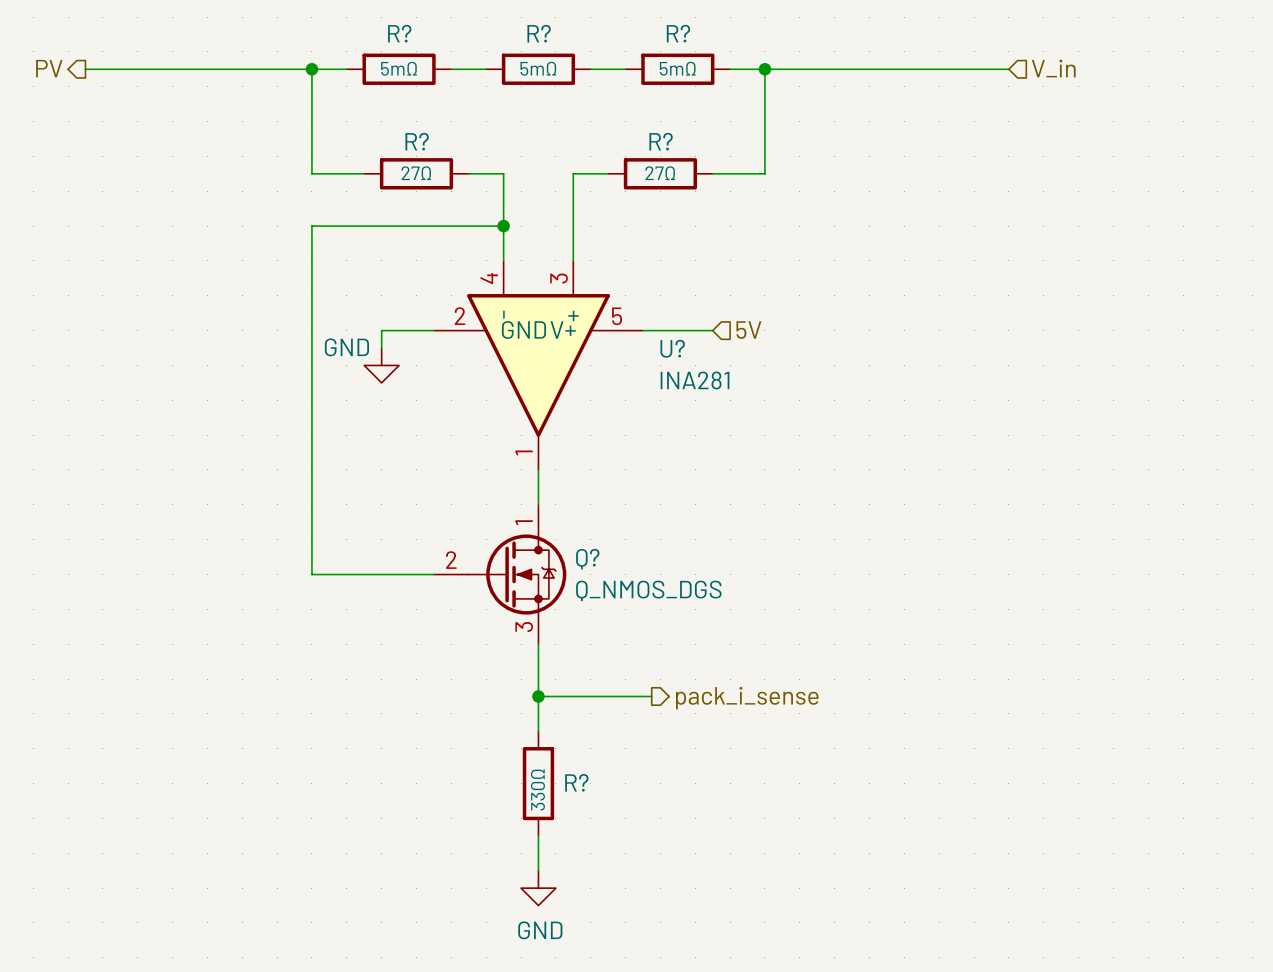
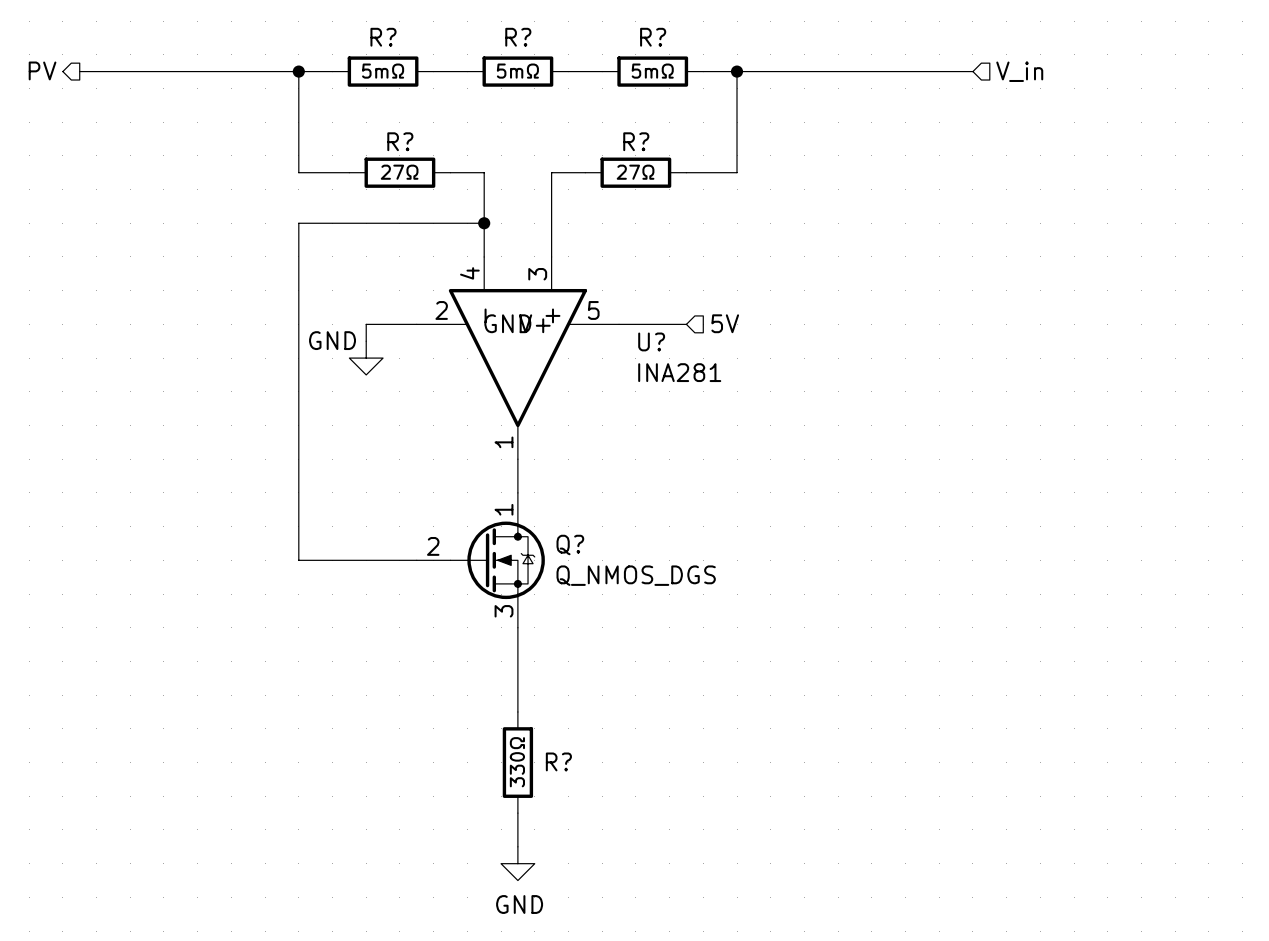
wire: (538, 696) (651, 696) -> none
junction: (538, 696) -> none
hierarchical label: pack_i_sense (747, 698) -> none

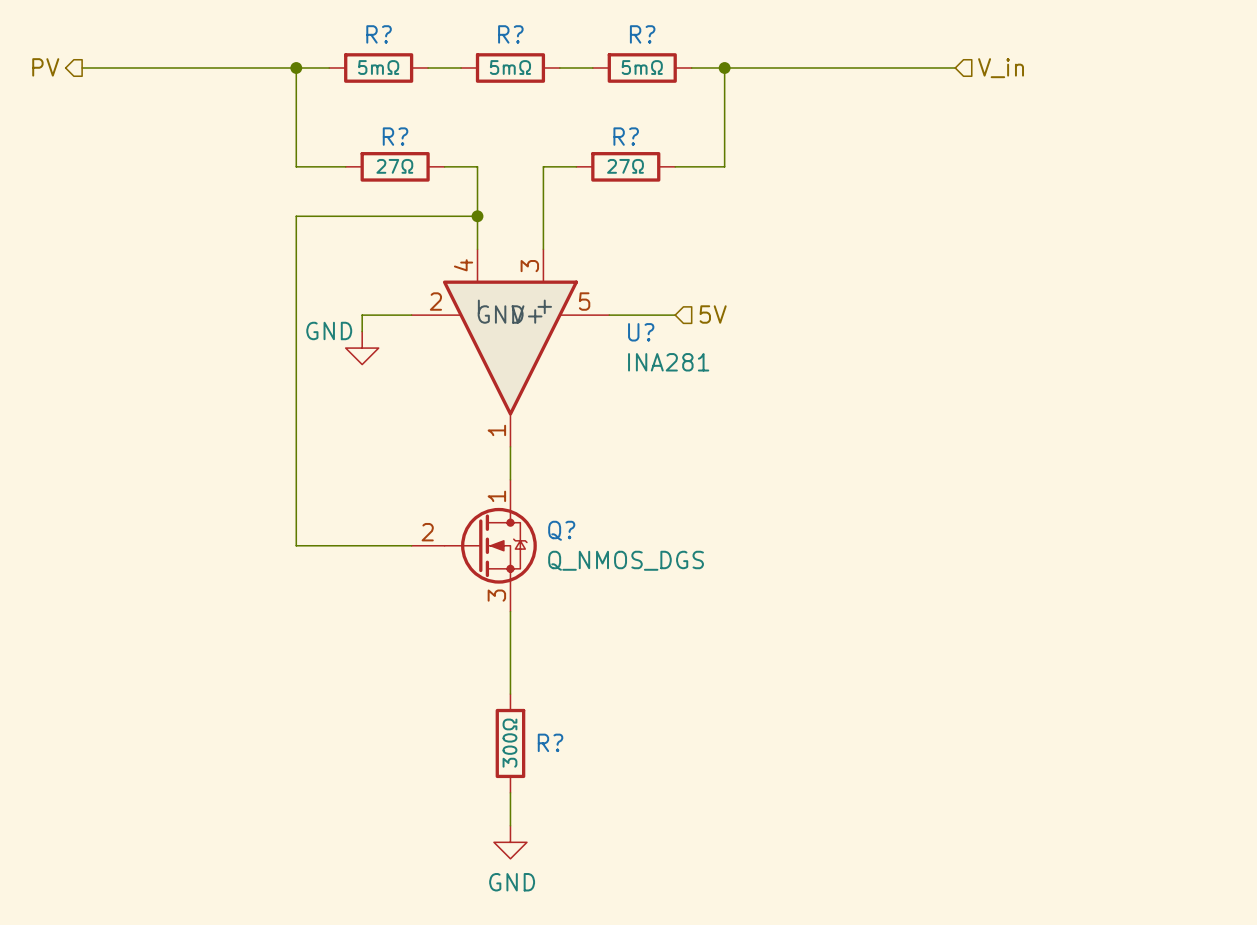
R? value: 330Ω (517, 762) -> 300Ω (509, 743)

